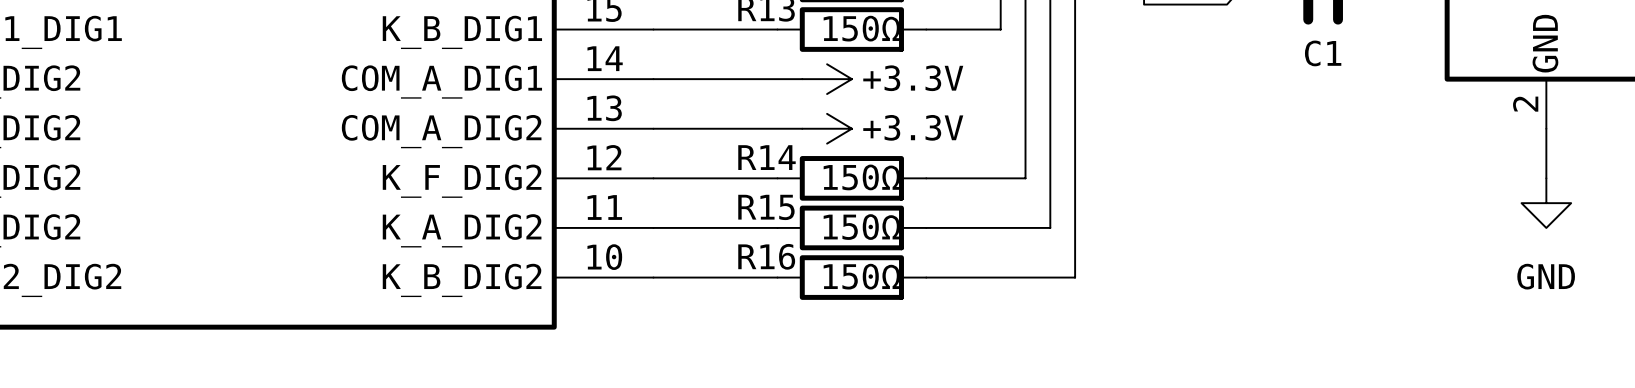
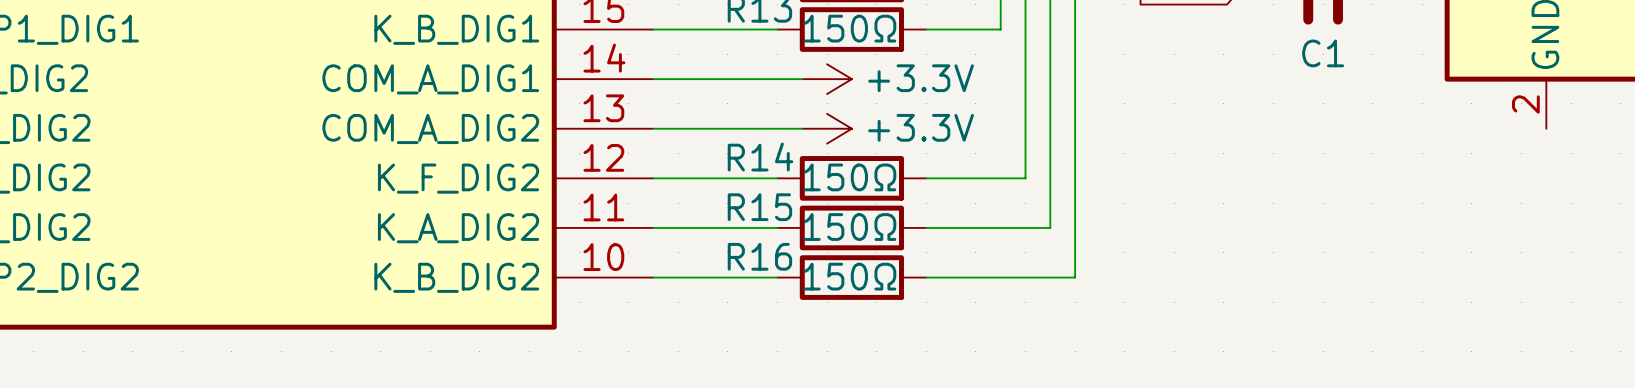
wire: (1546, 128) (1546, 178) -> none
power symbol: GND (1546, 203) -> none

